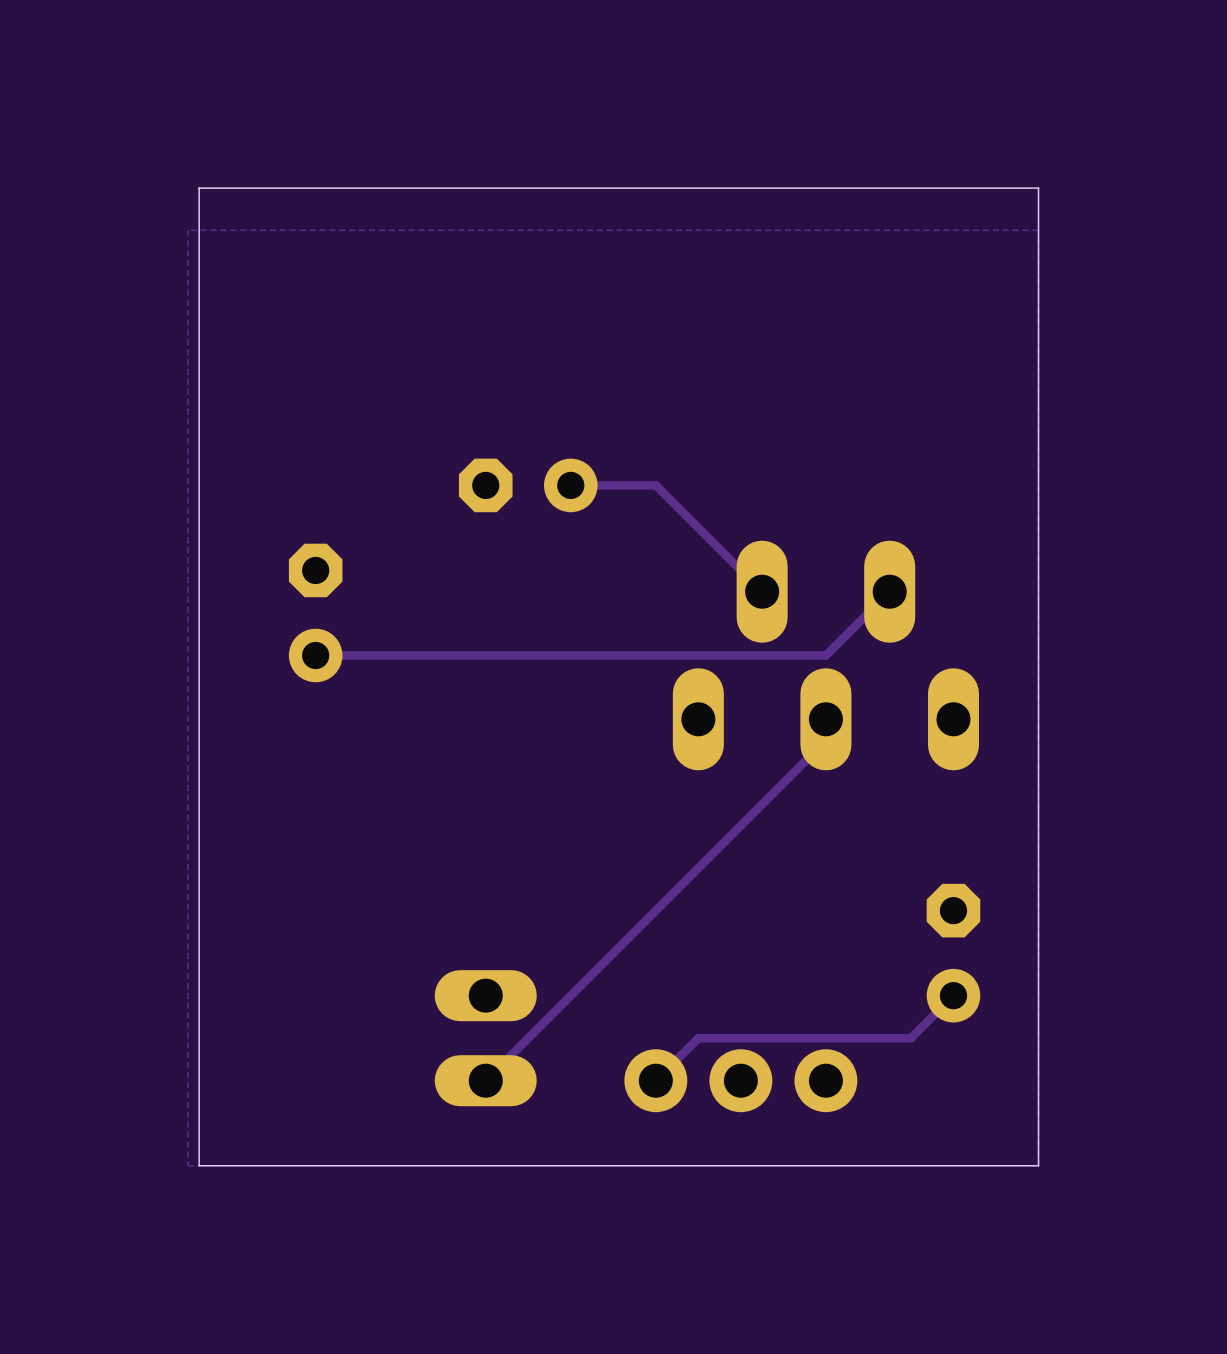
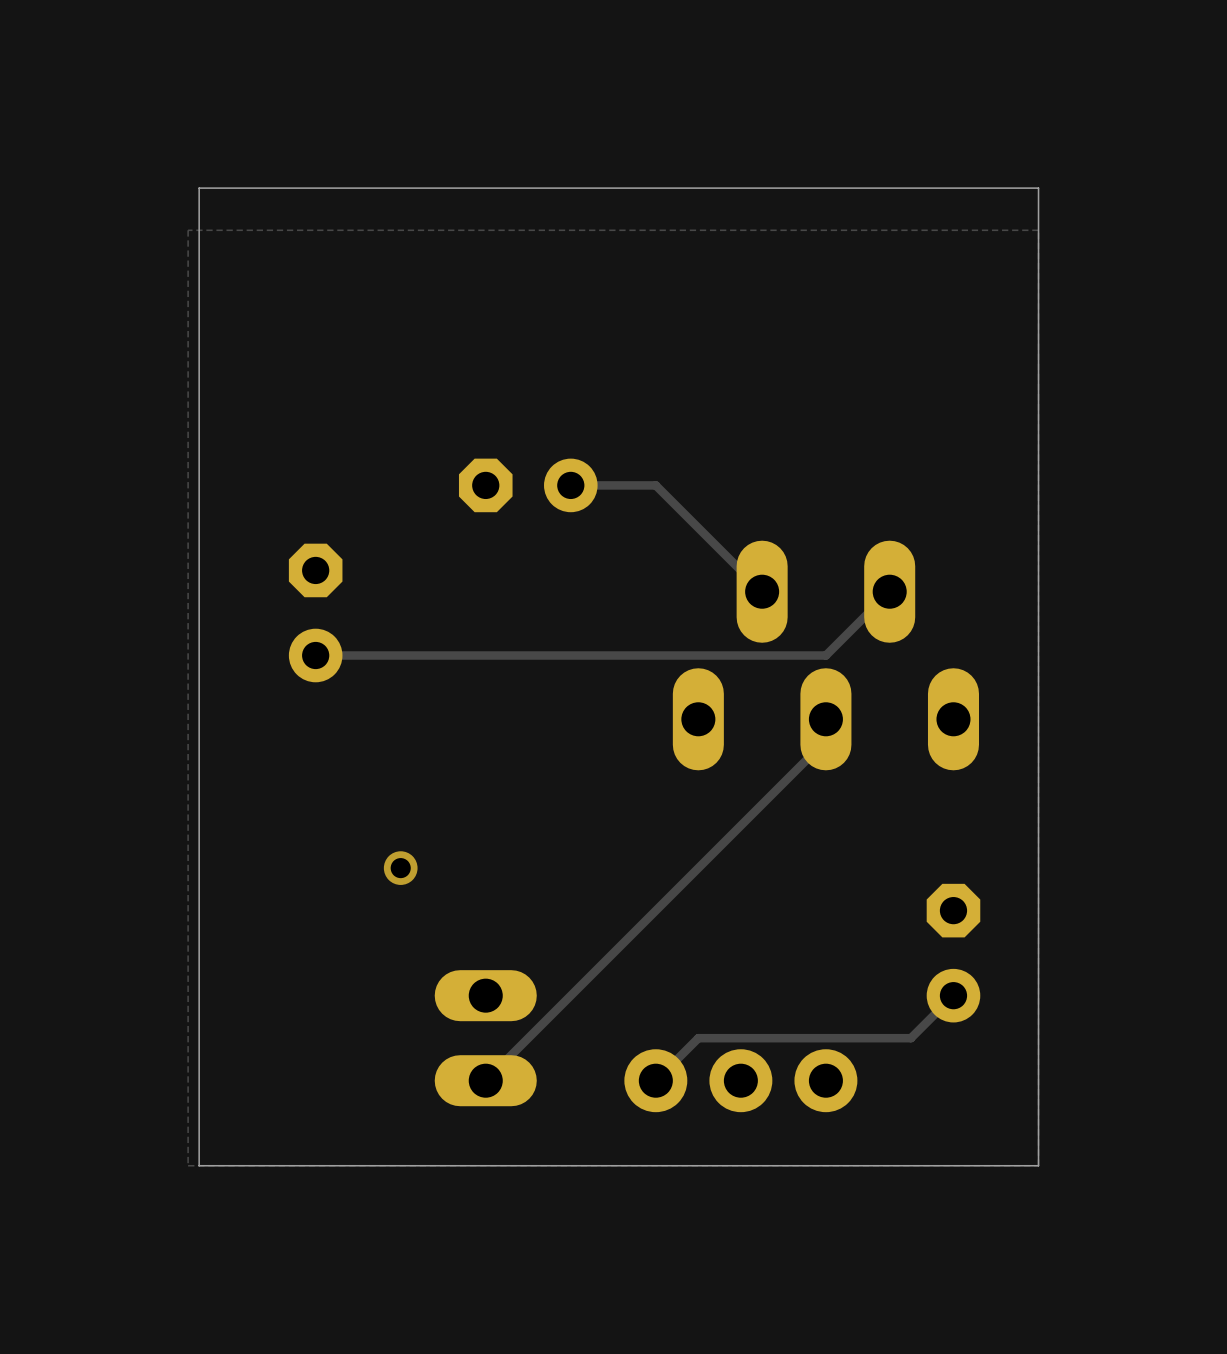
via: none -> (400, 868)

